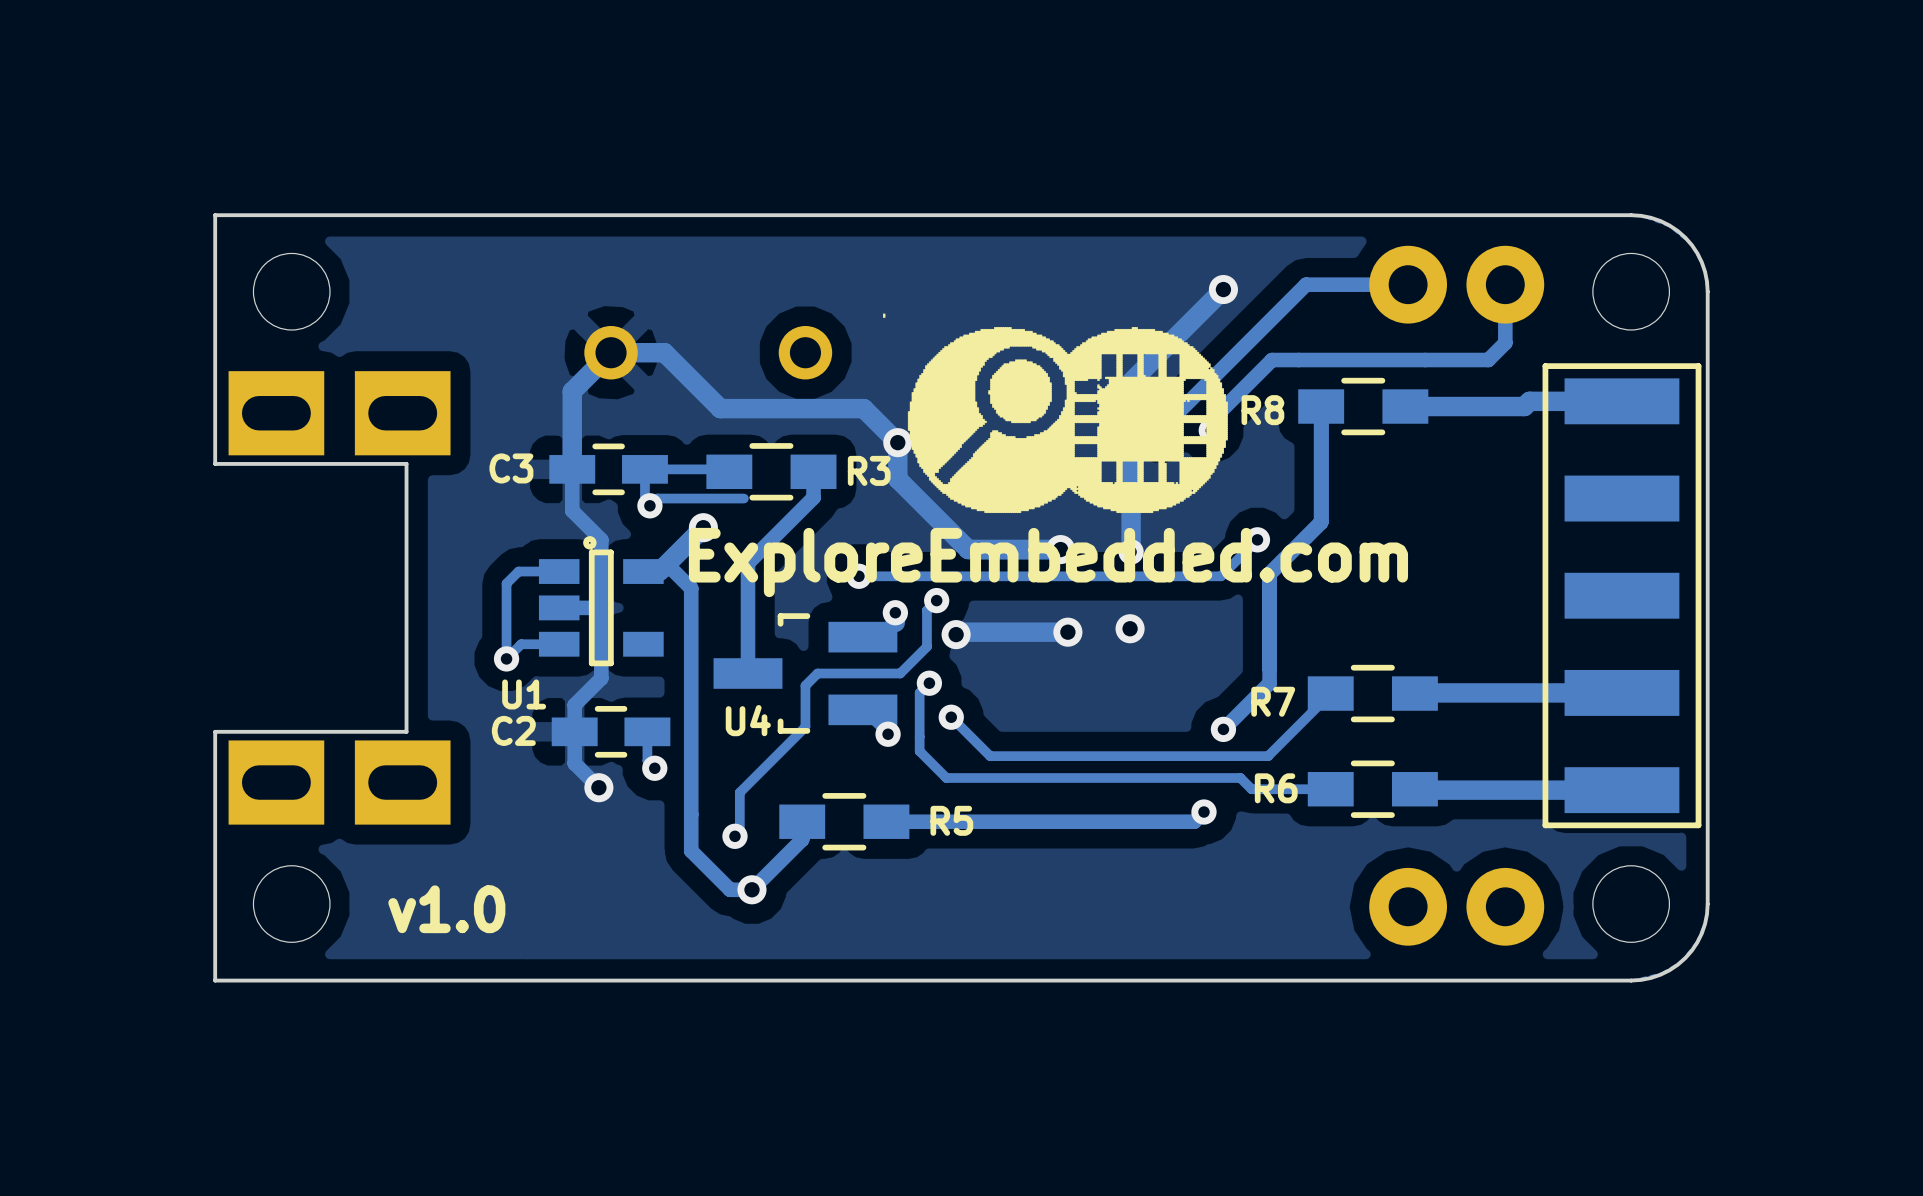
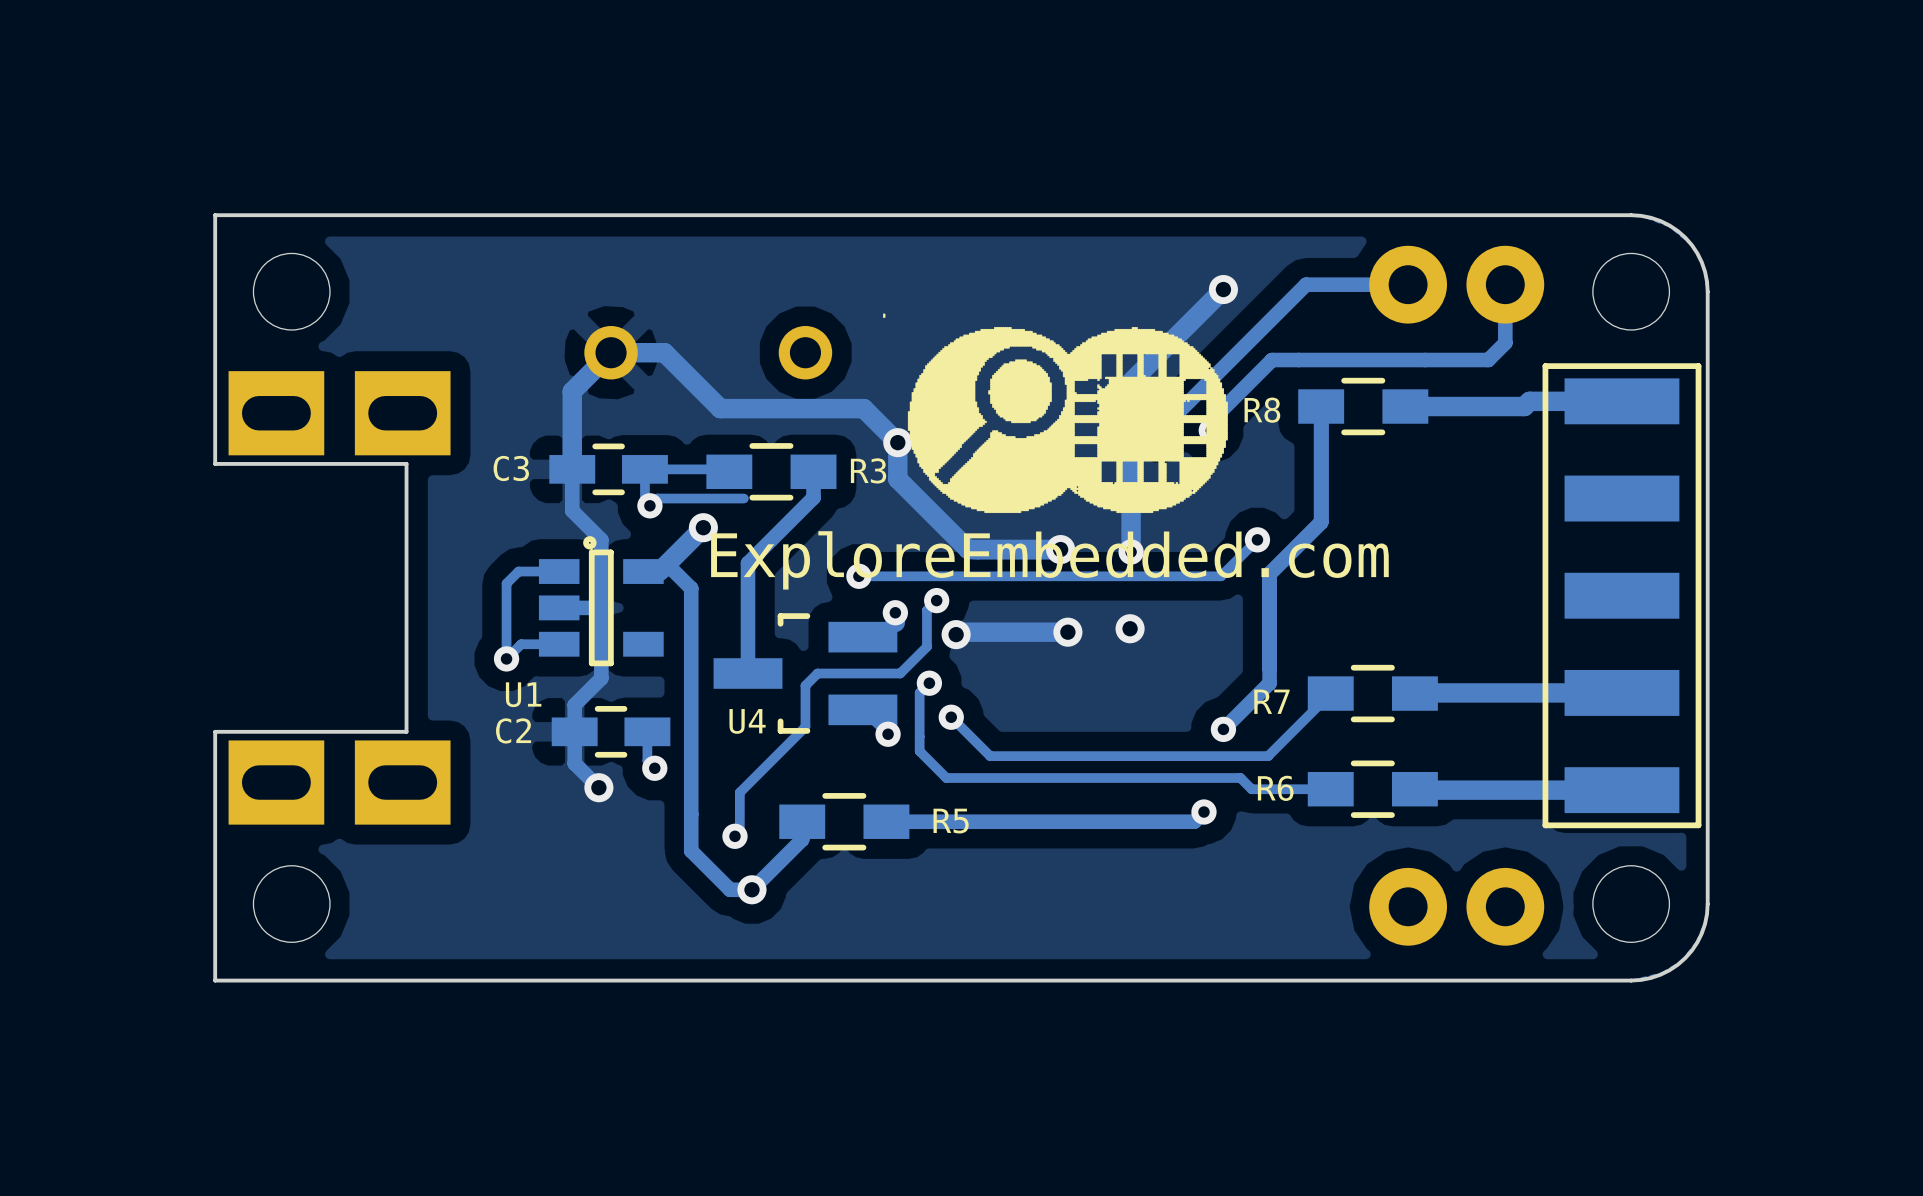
text: v1.0 (446, 909) -> none

